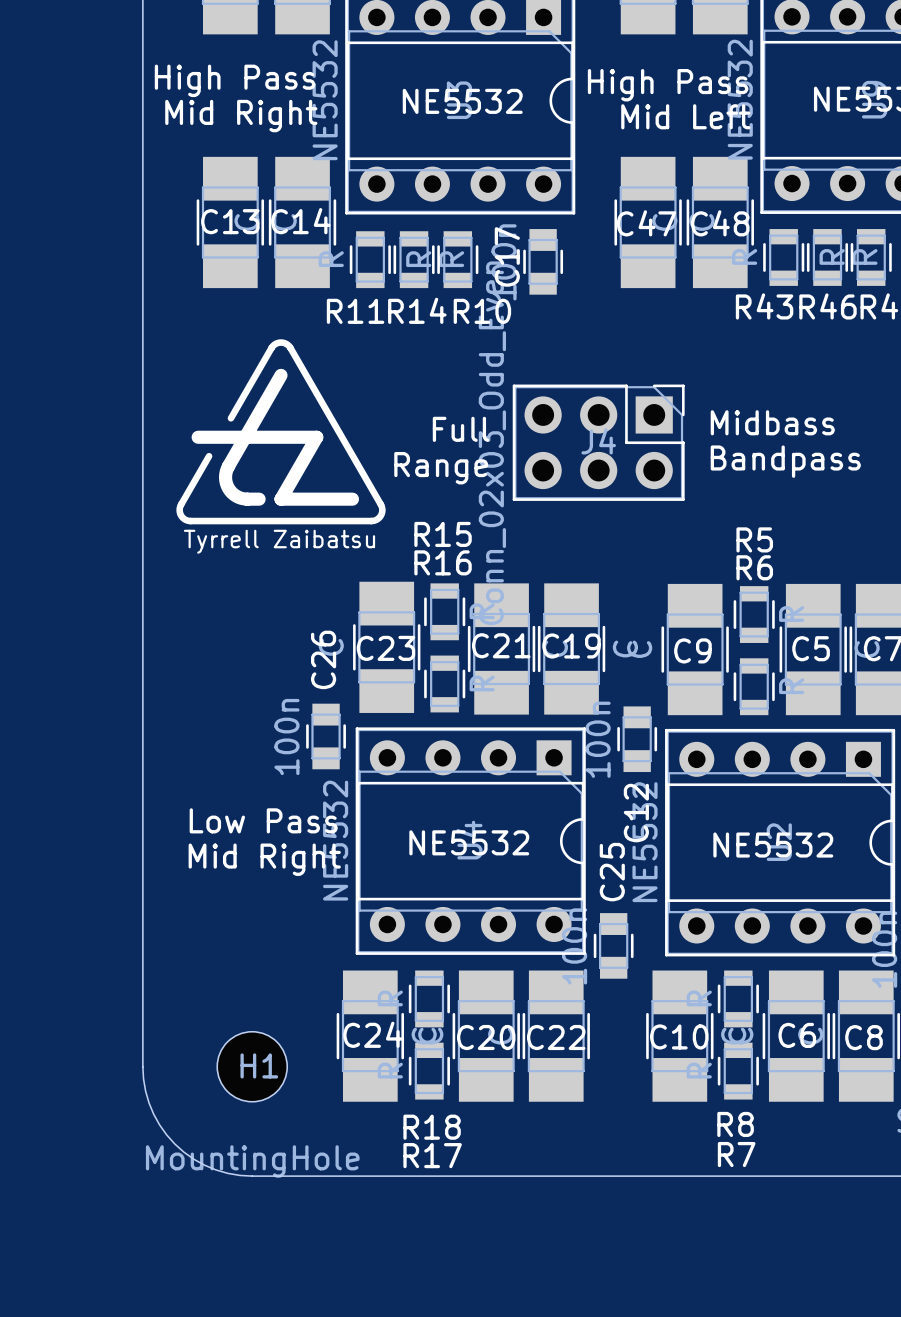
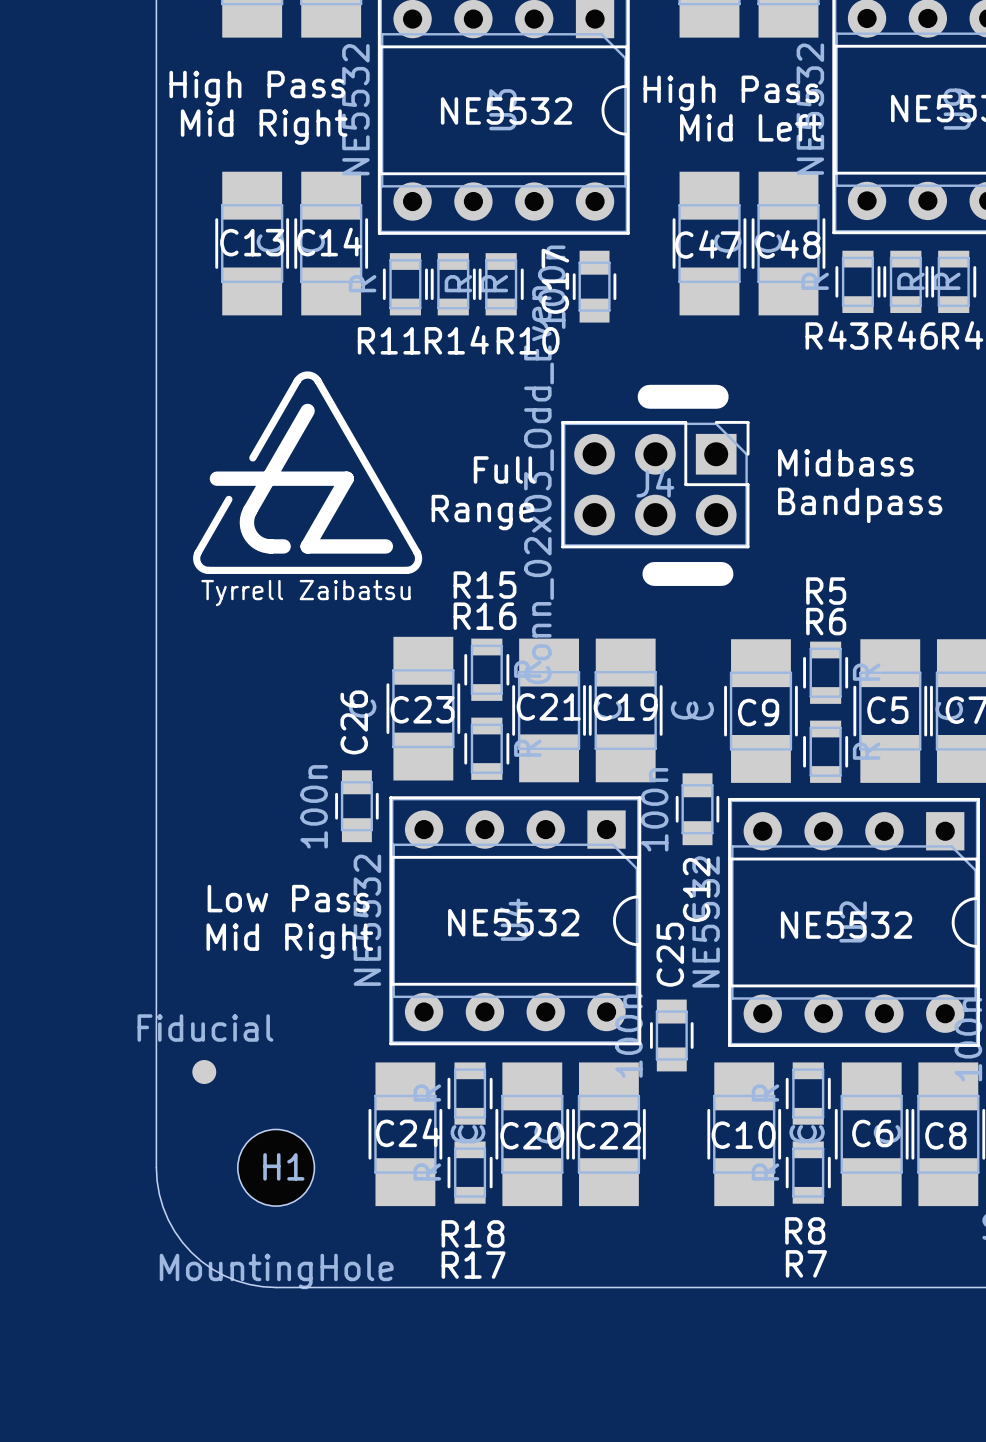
line: none -> (649, 396) (716, 396)
line: none -> (654, 573) (721, 573)
part: none -> Fiducial (204, 1072)

